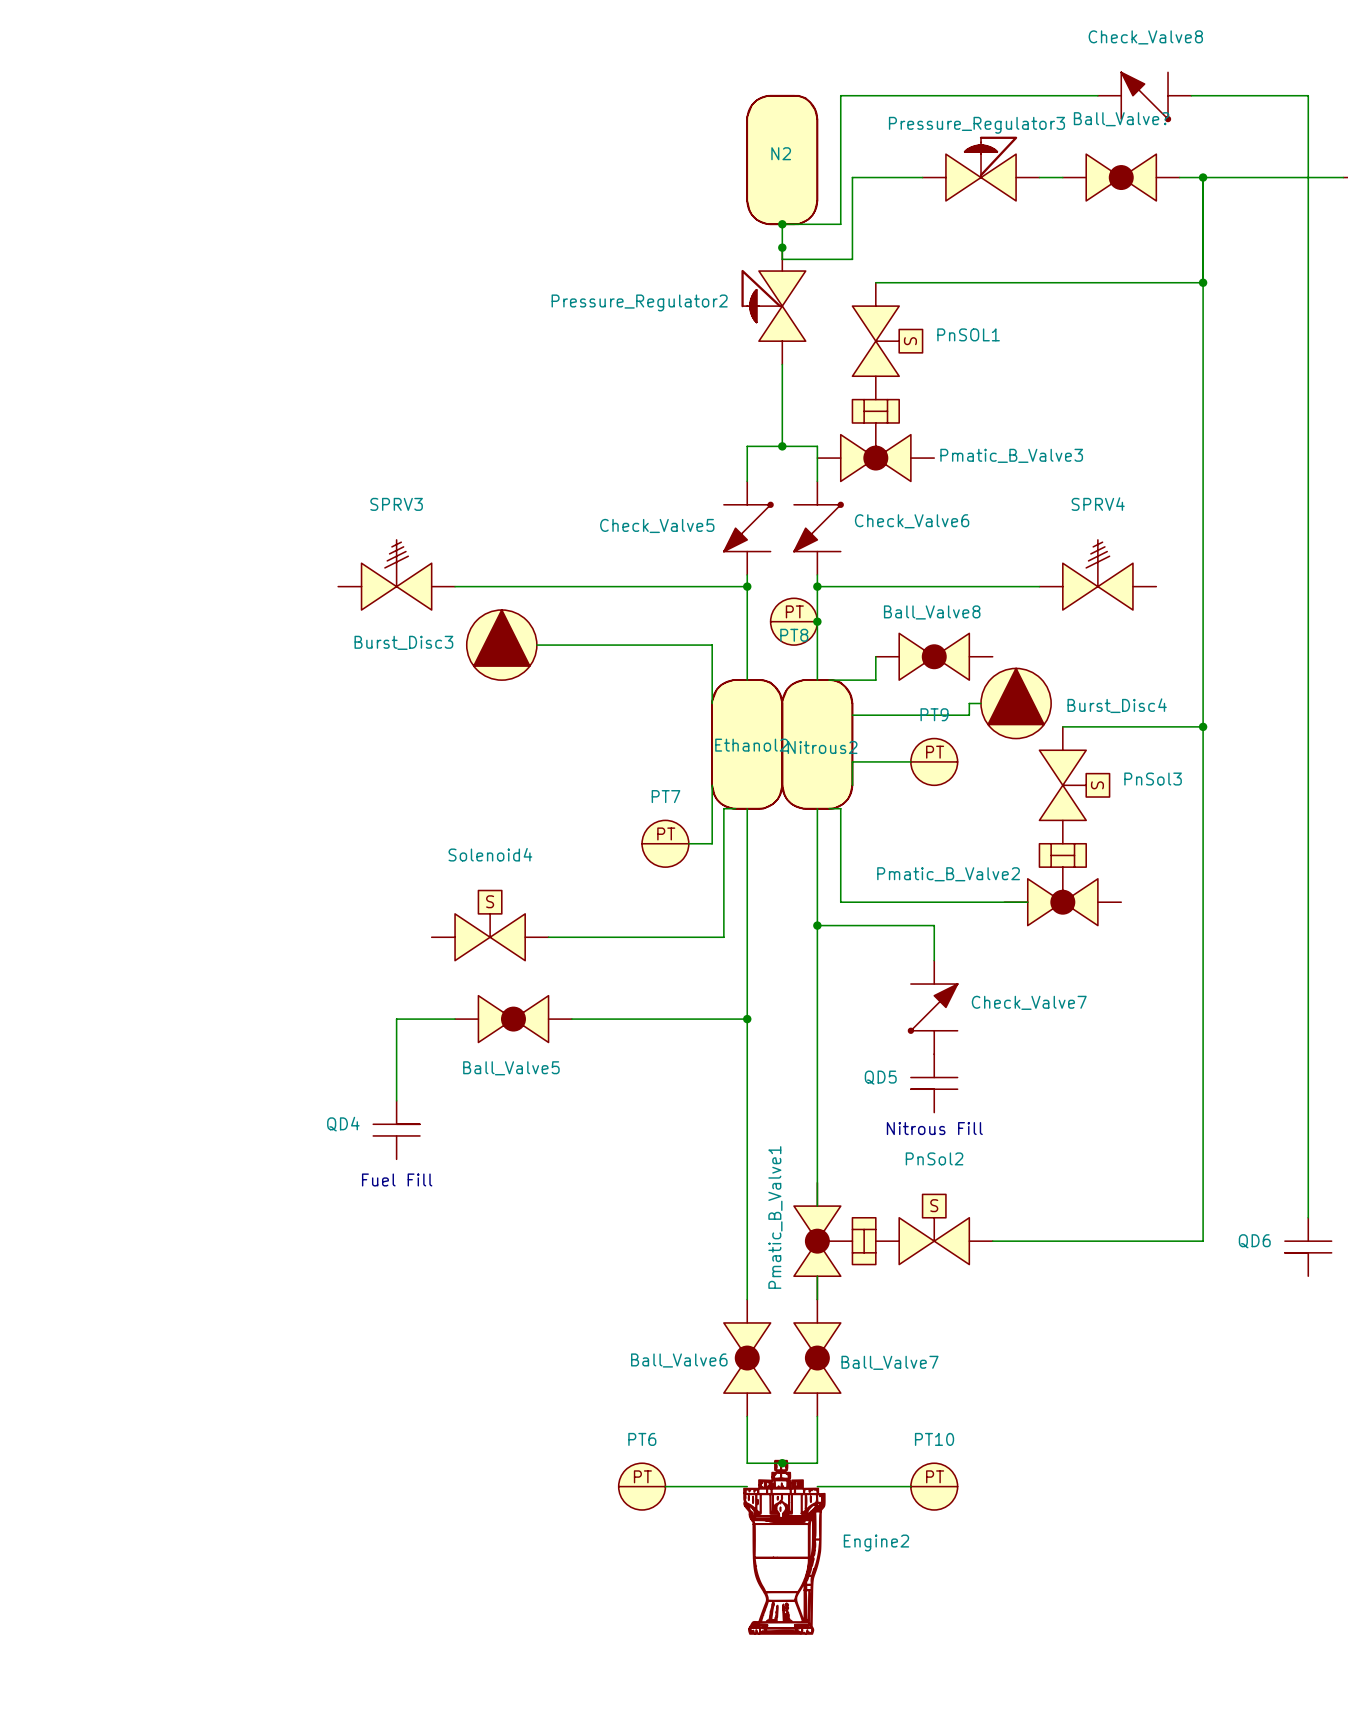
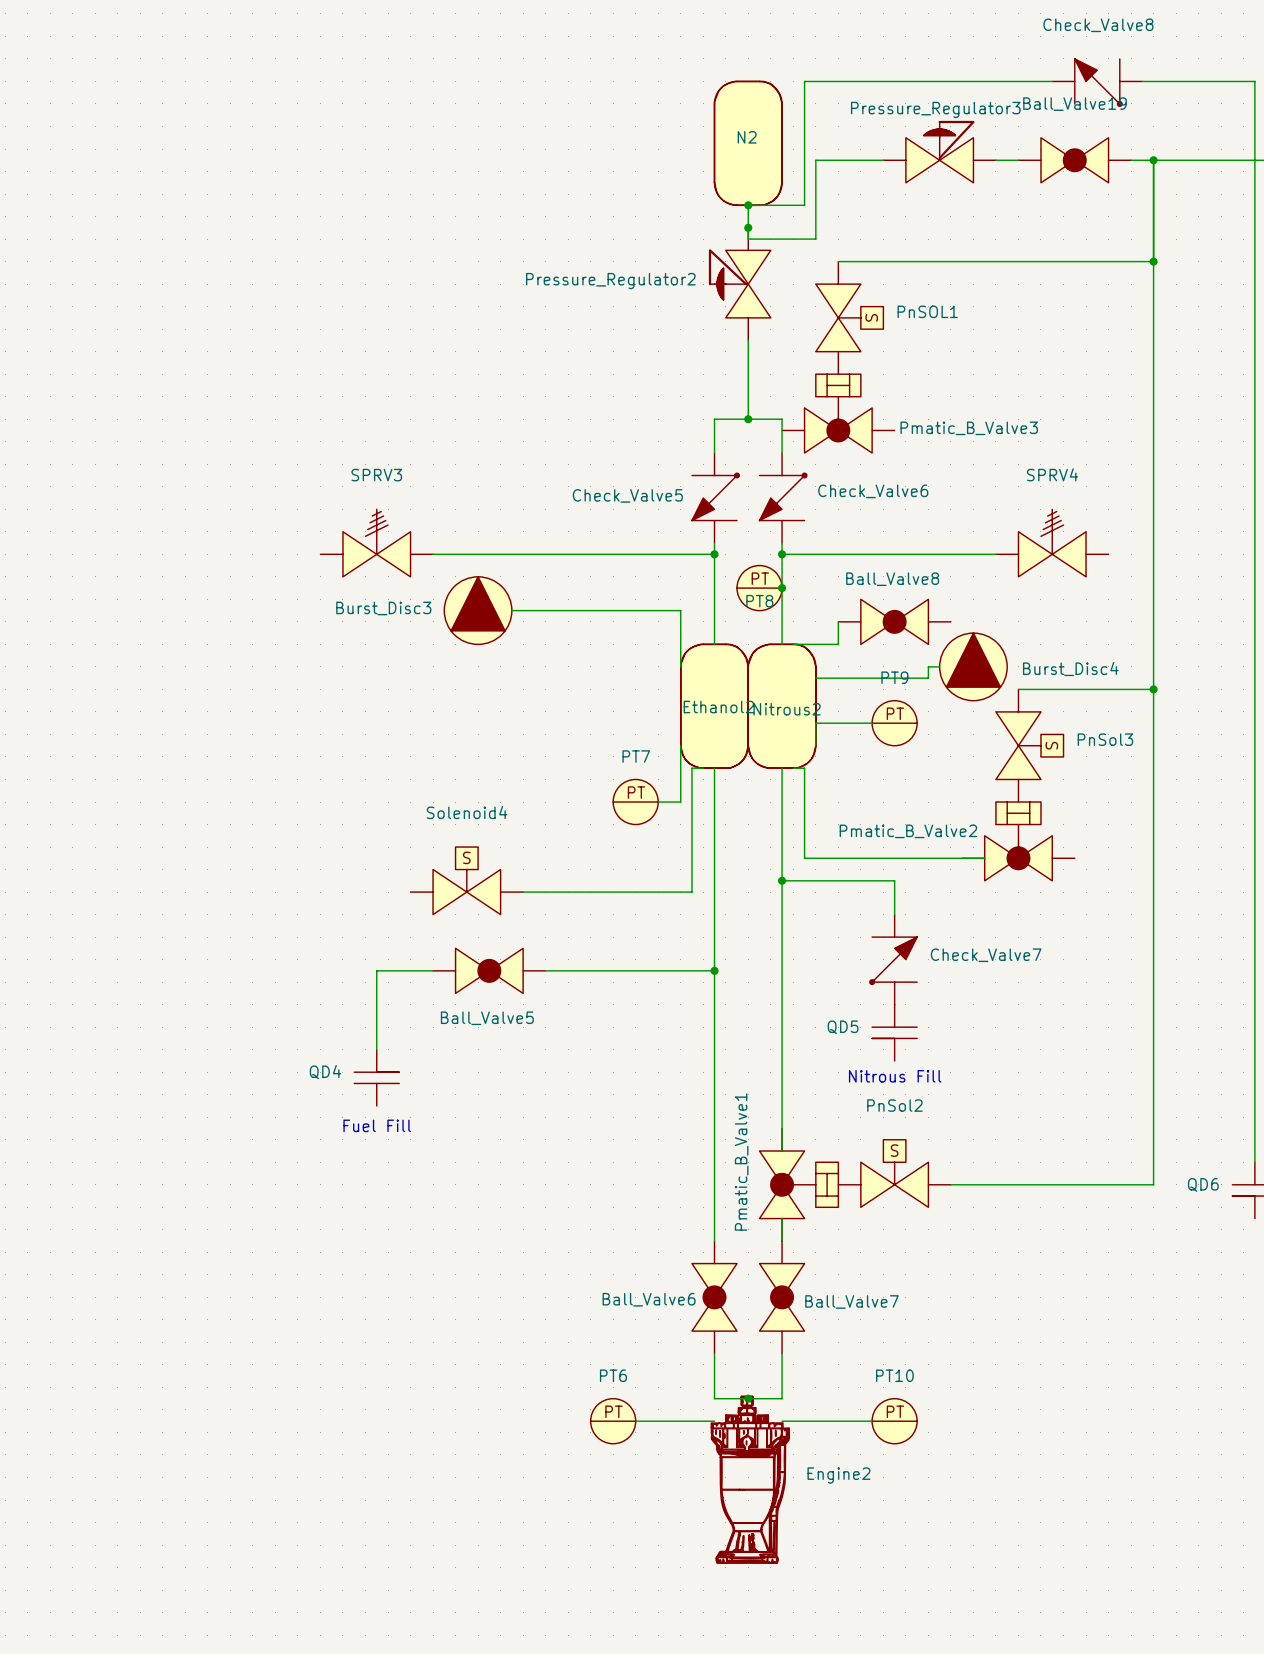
Ball_Valve? name: Ball_Valve? (1121, 119) -> Ball_Valve19 (1075, 104)

